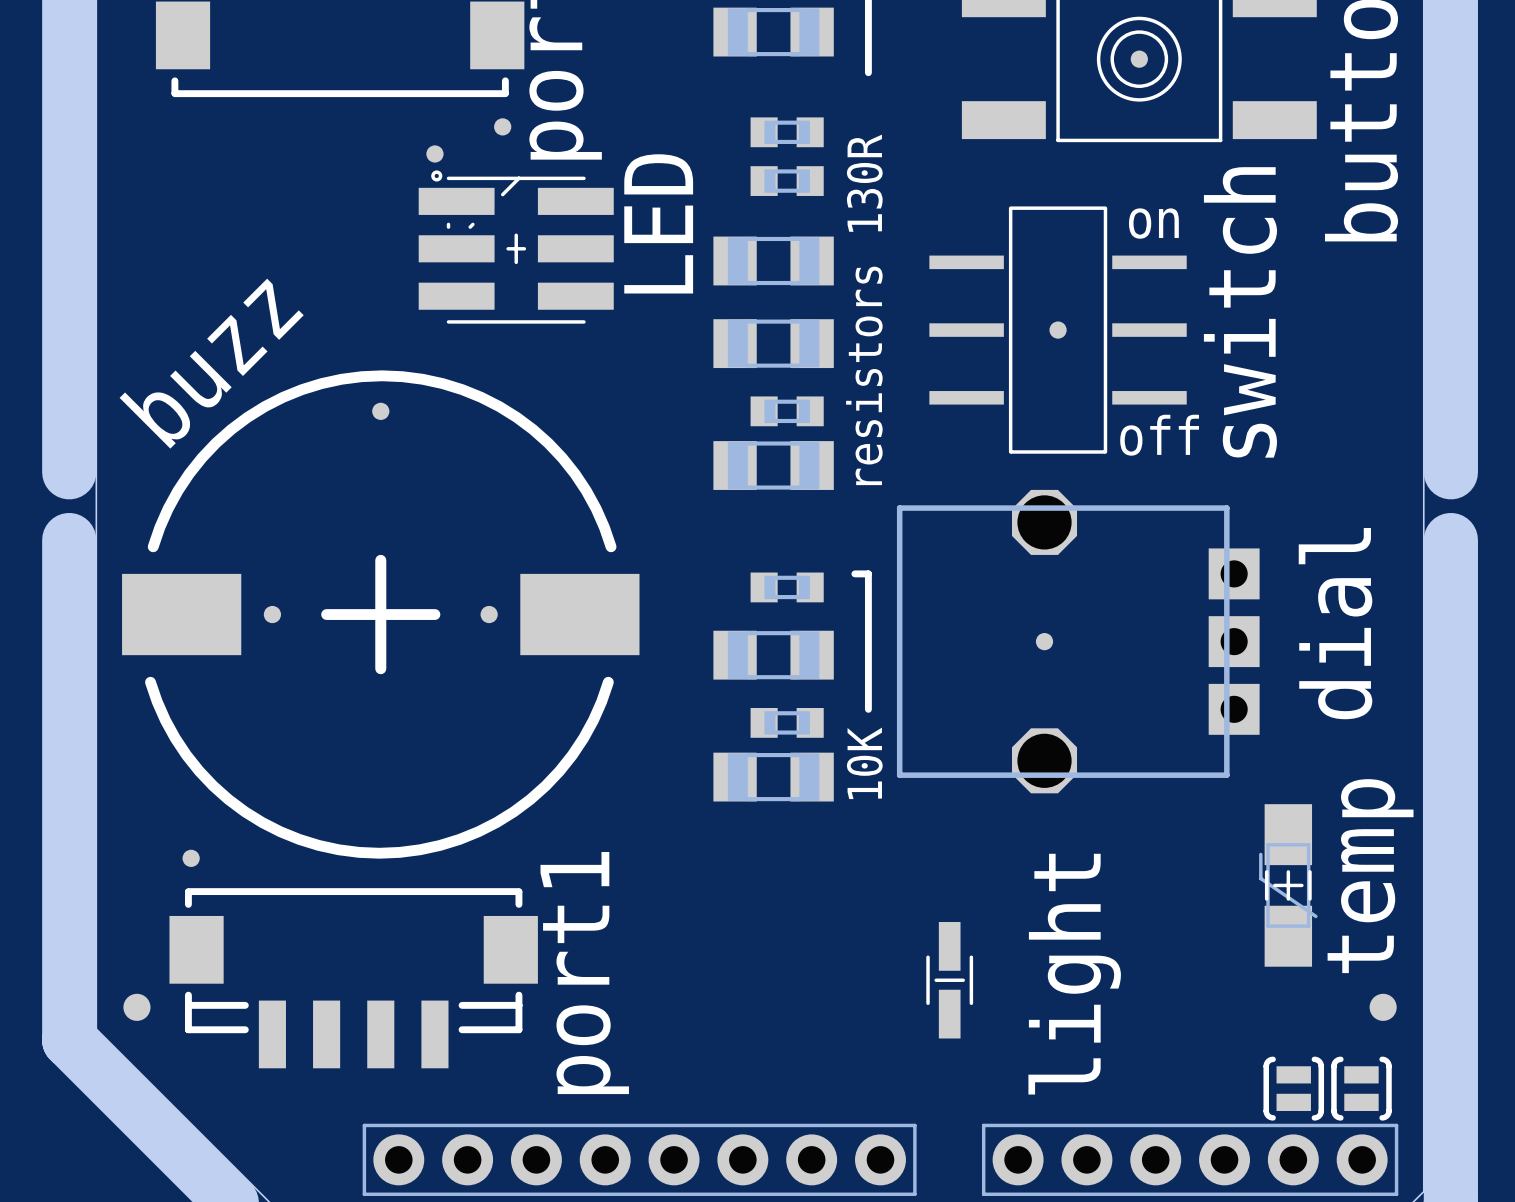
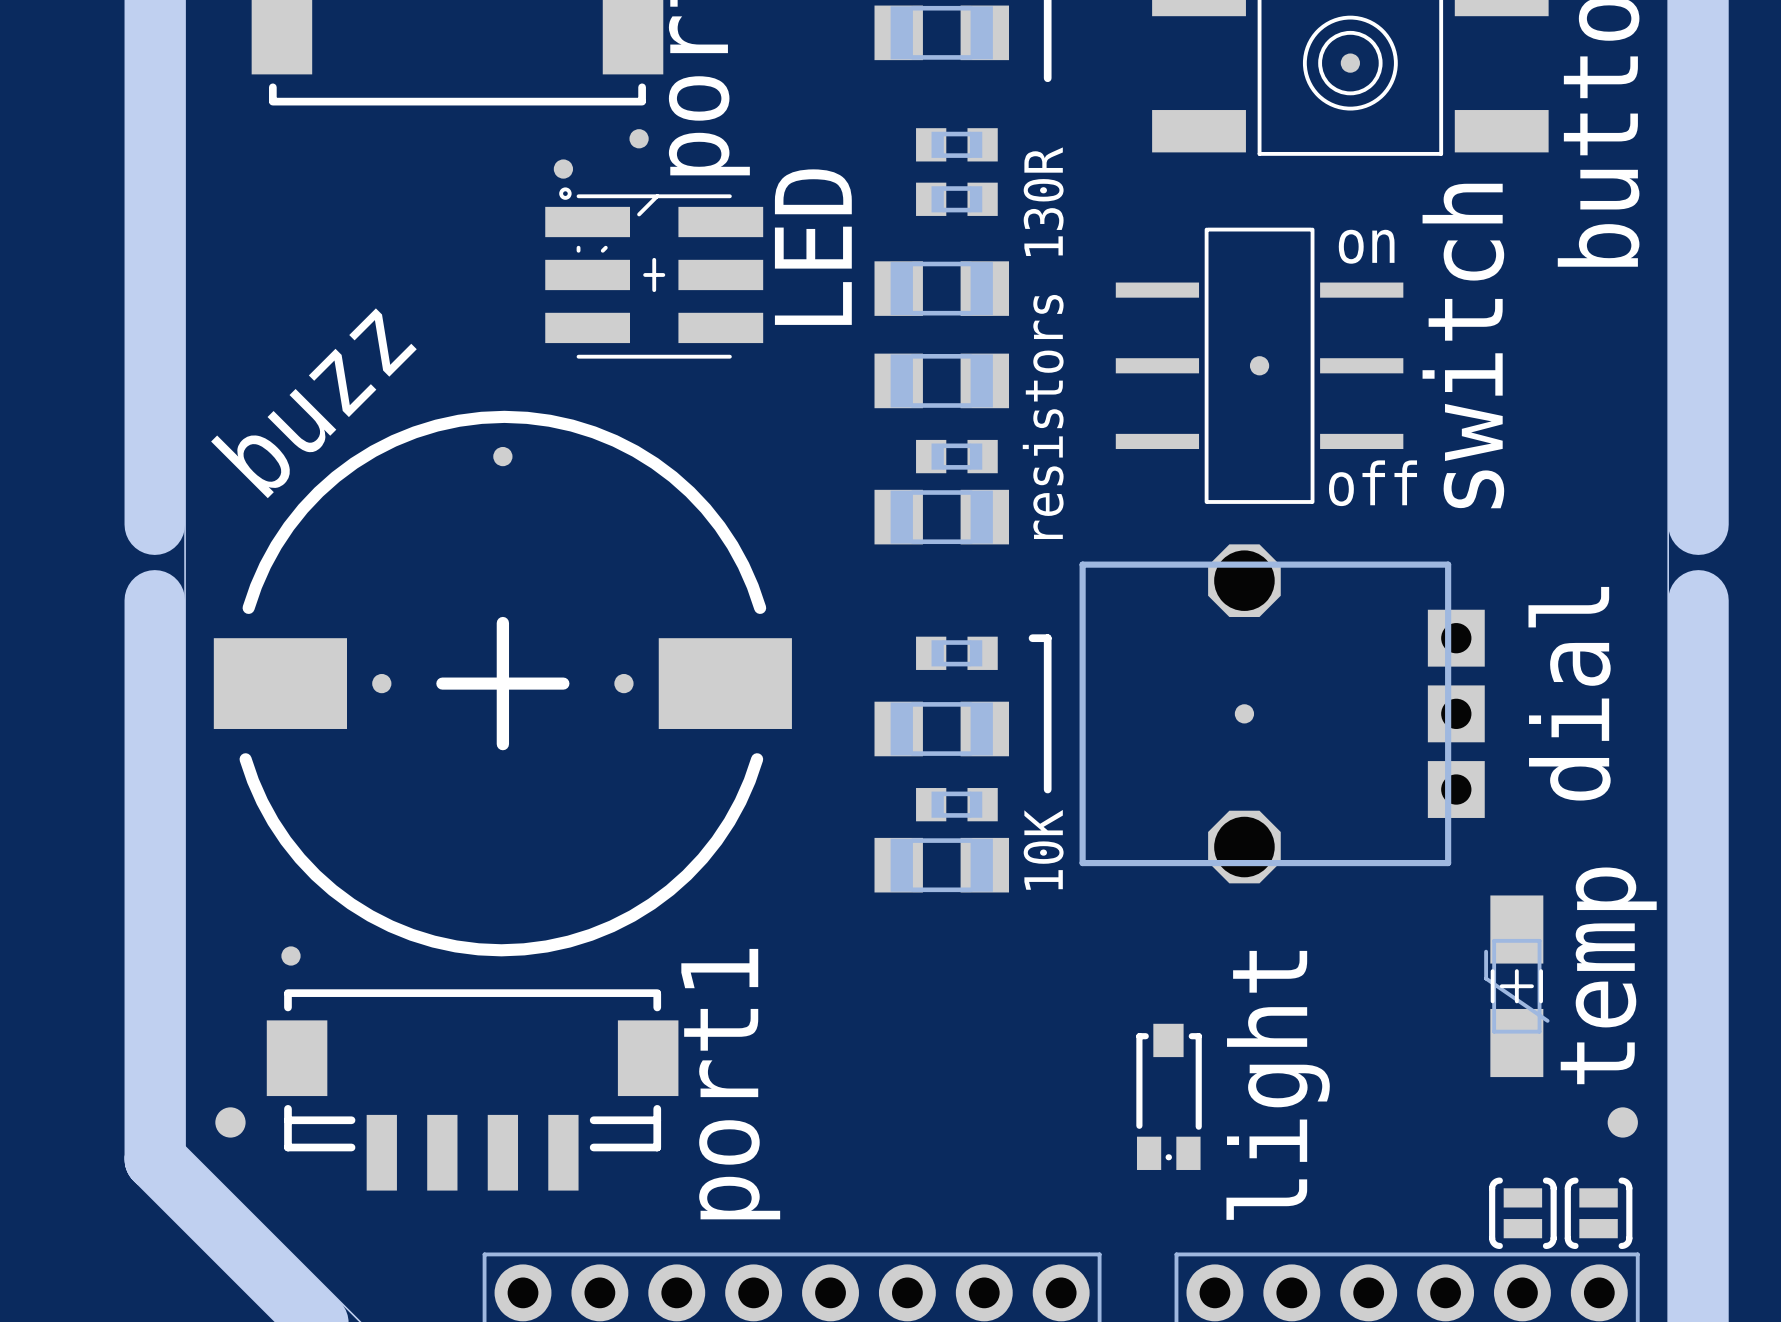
part: (949, 980) -> none
part: none -> (1169, 1096)

